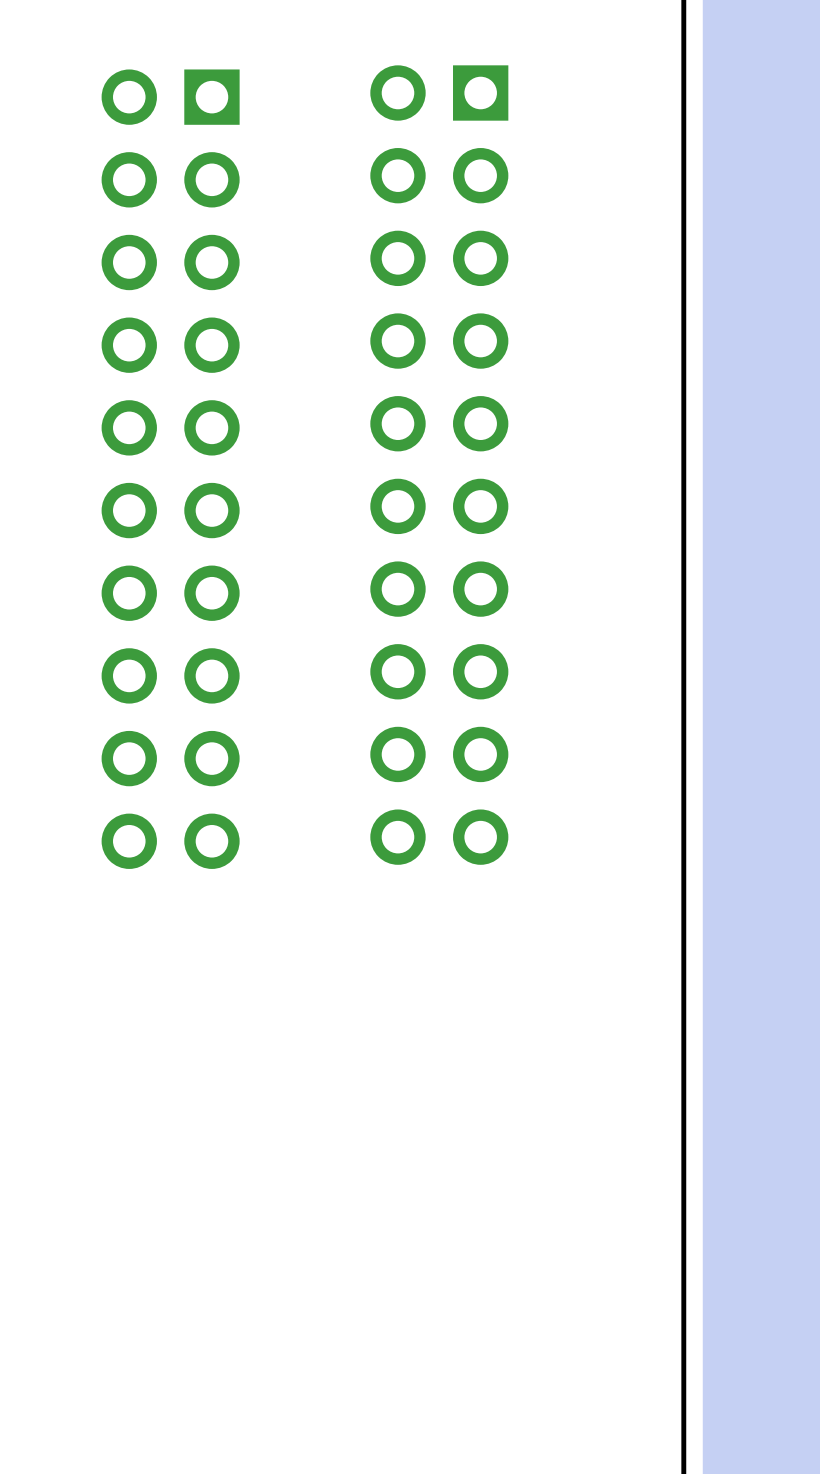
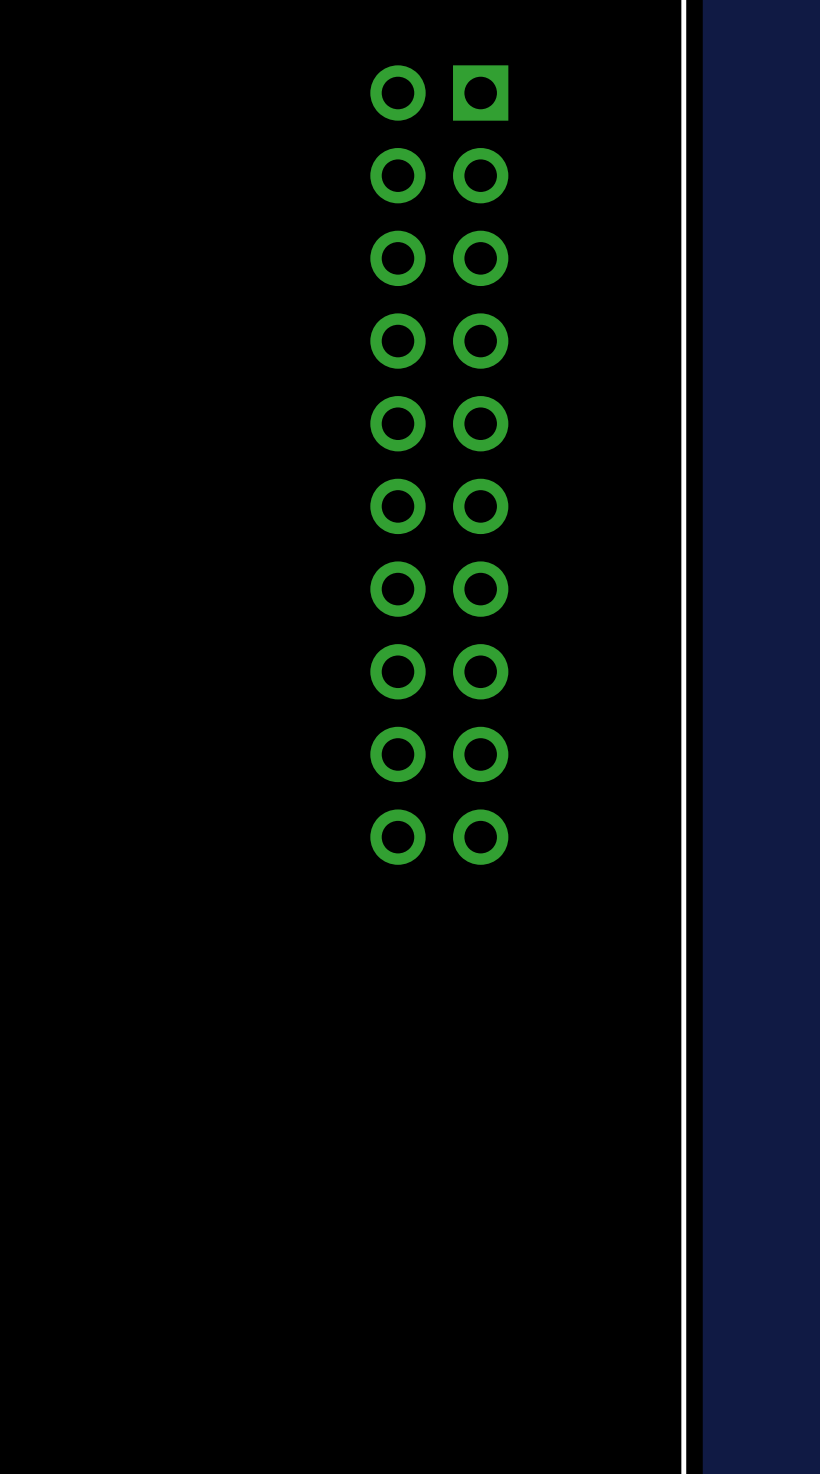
part: (170, 469) -> none

